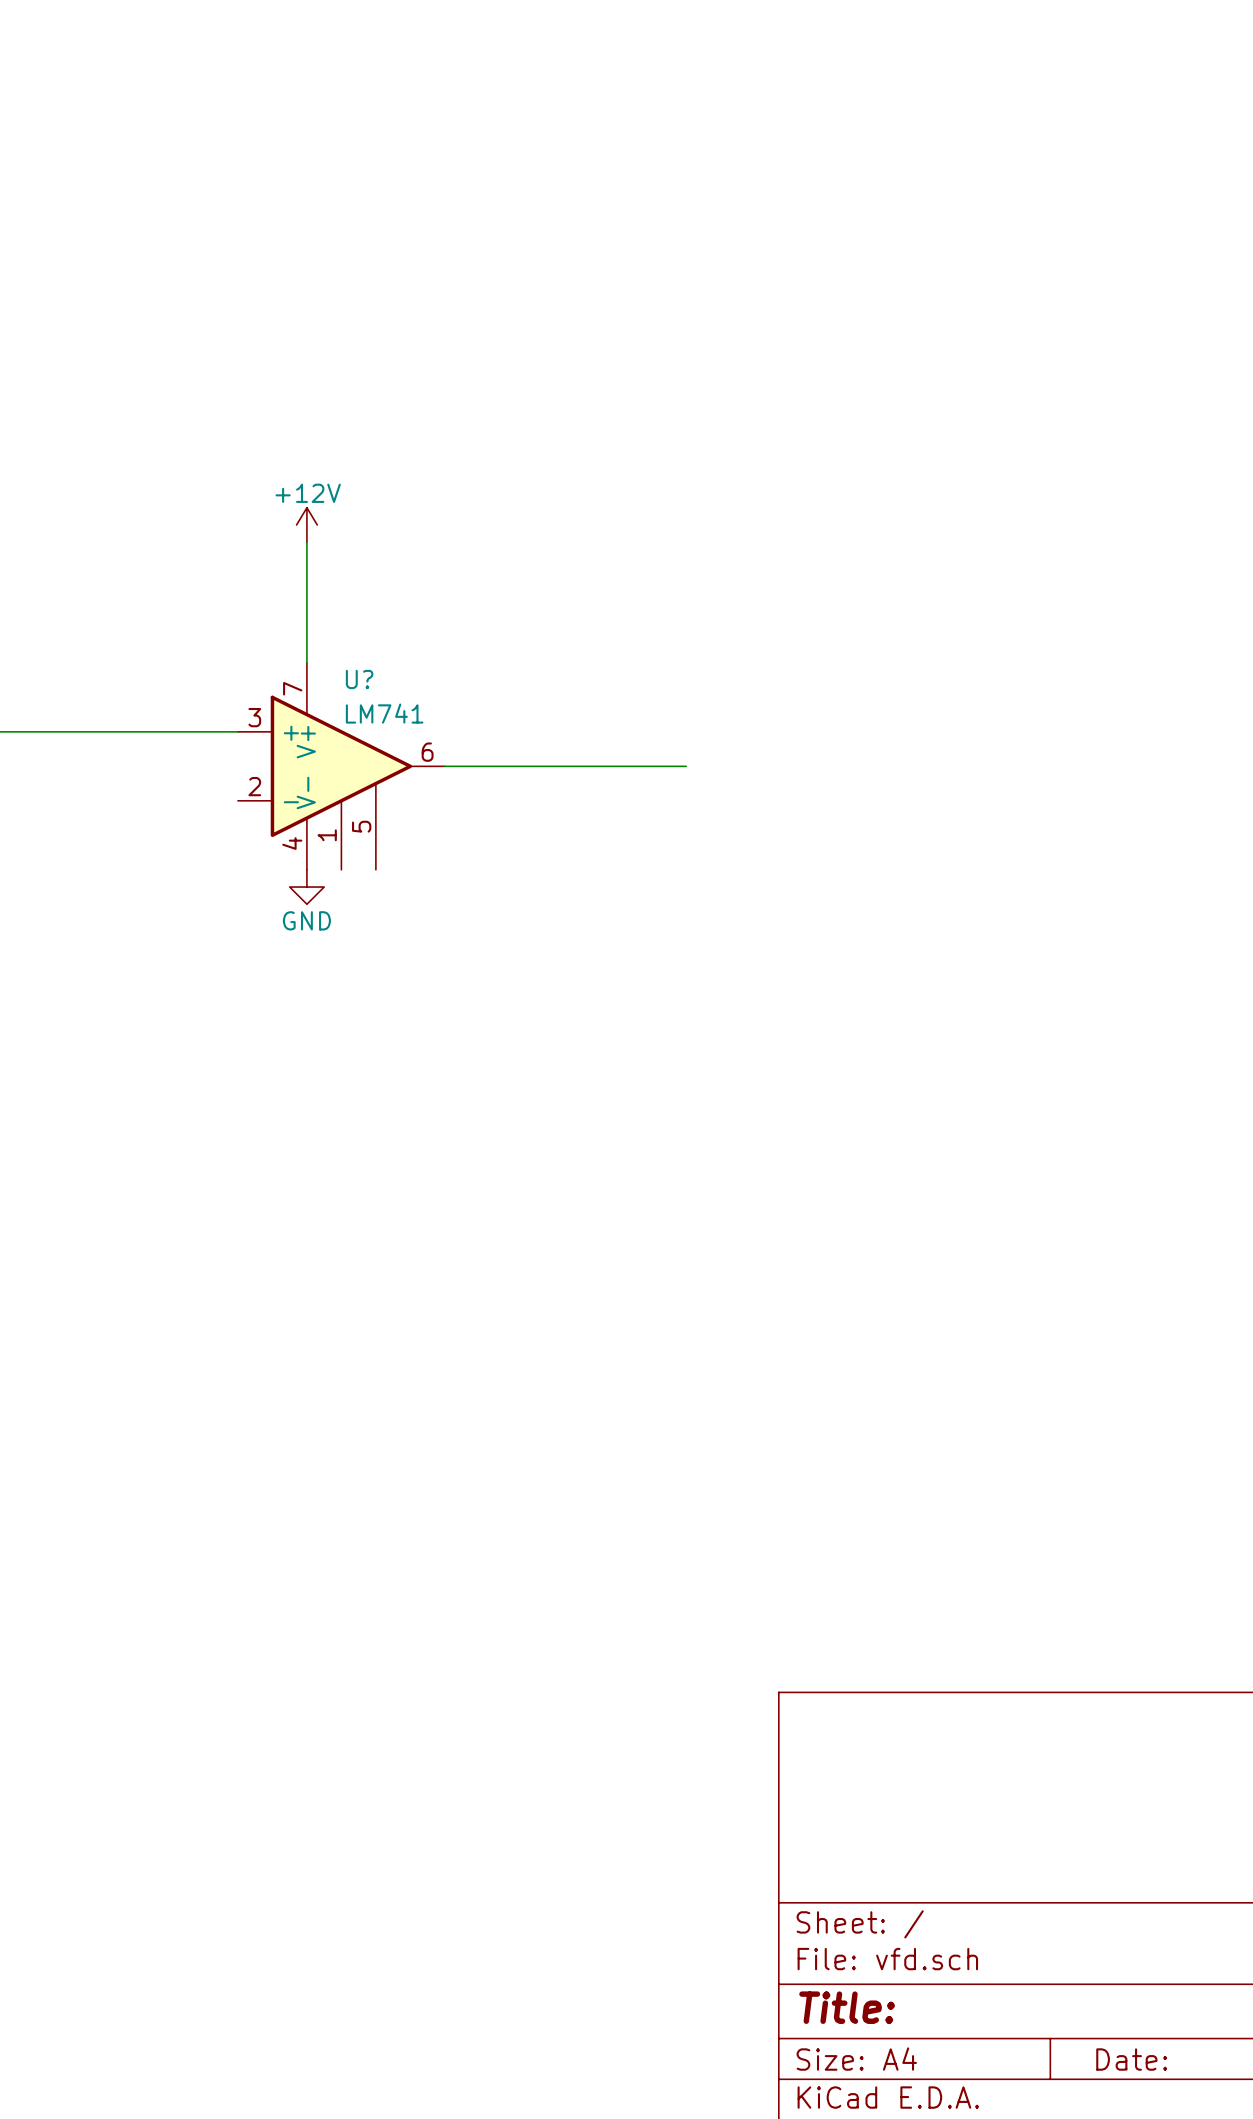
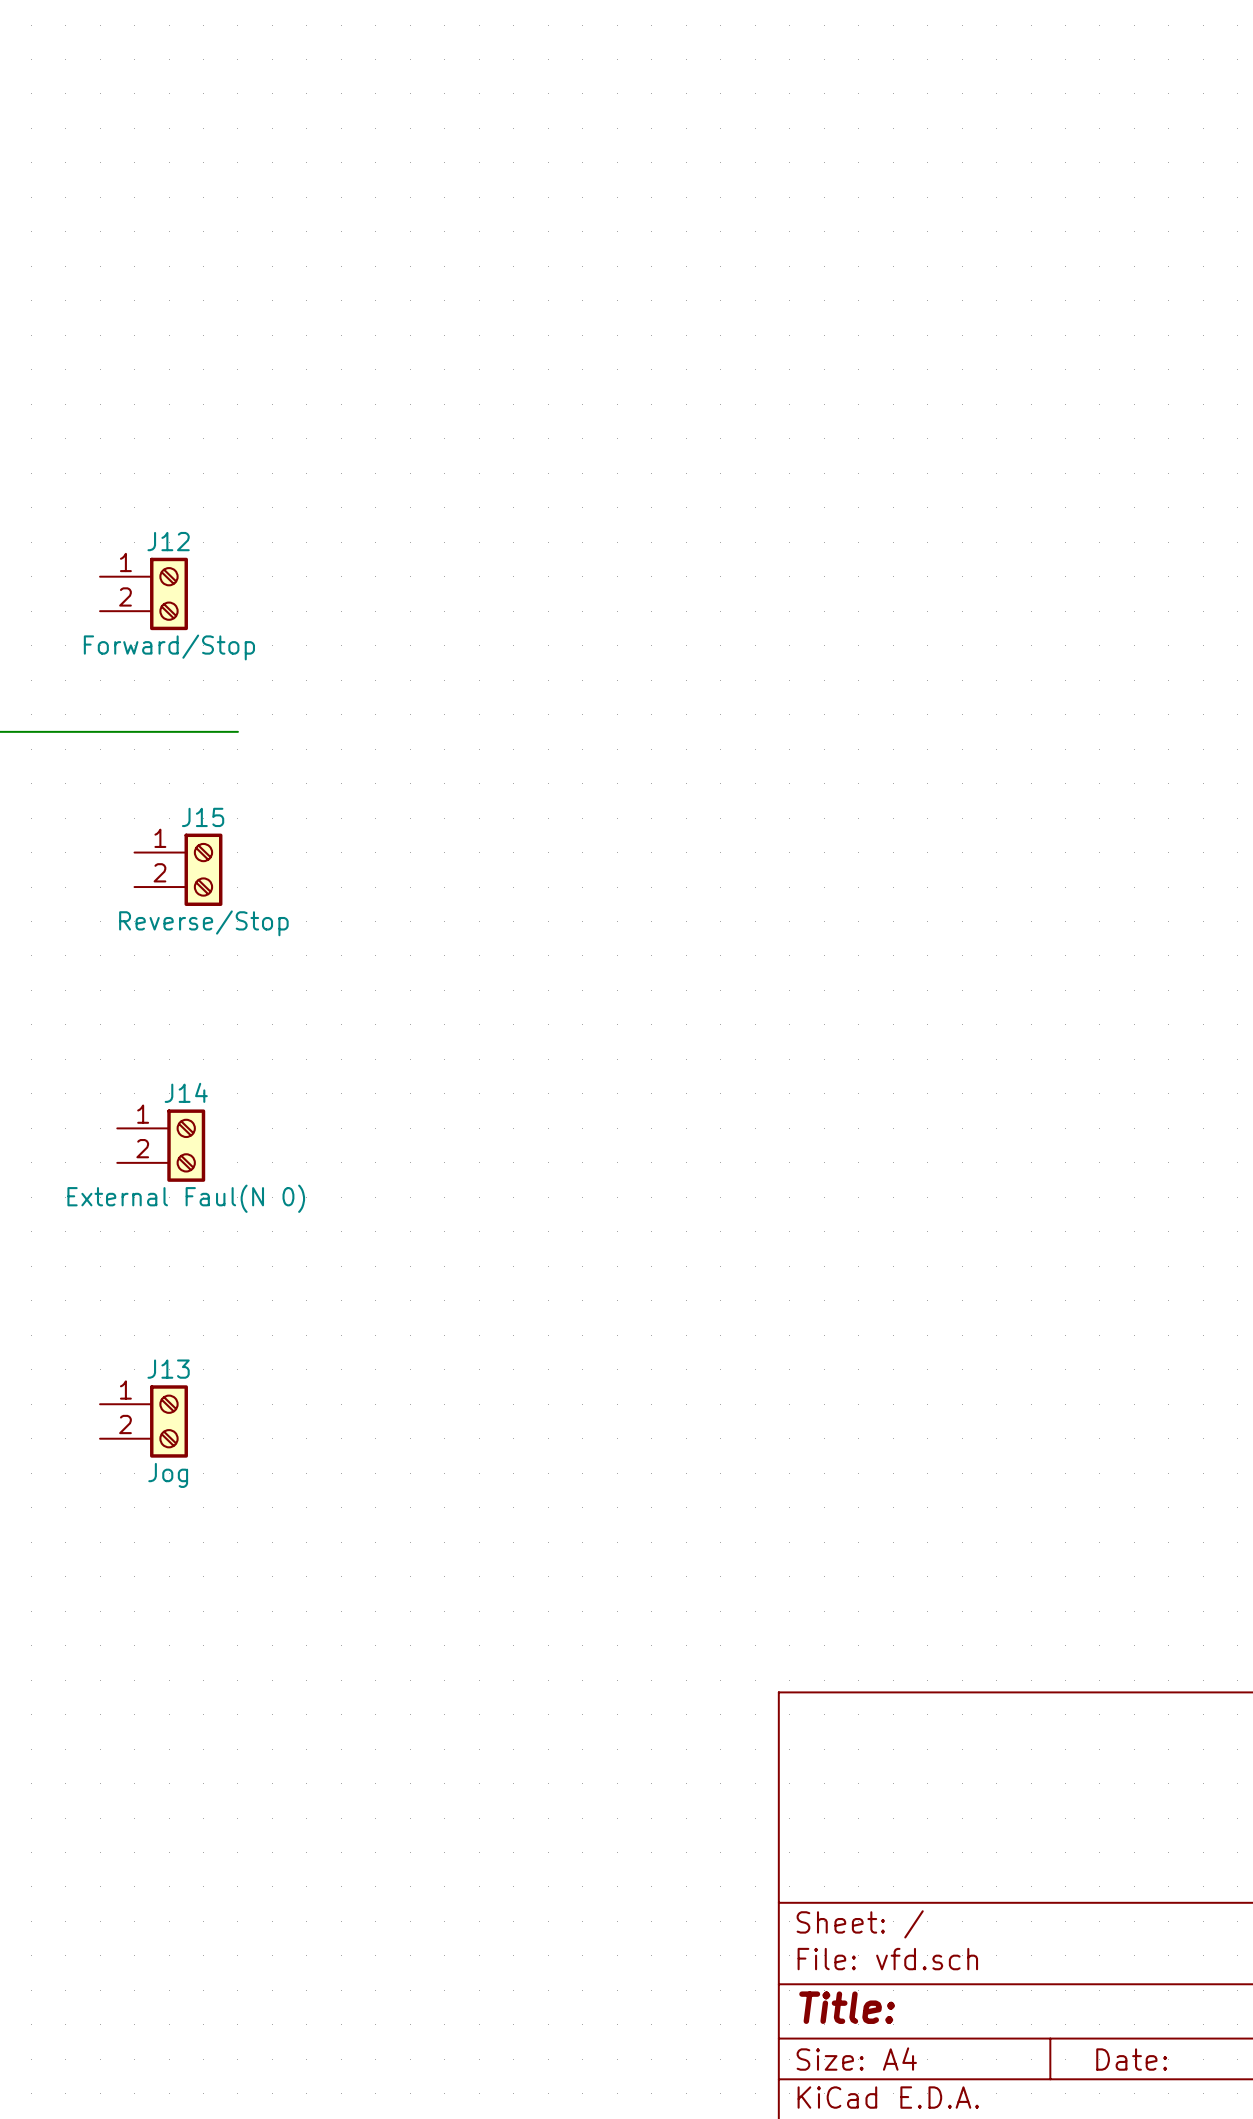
power symbol: +12V (306, 524) -> none
wire: (306, 542) (306, 662) -> none
J12: none -> Forward/Stop (144, 593)
U?: LM741 (341, 766) -> none
wire: (444, 766) (686, 766) -> none
J15: none -> Reverse/Stop (178, 869)
power symbol: GND (306, 887) -> none
J14: none -> External Faul(N 0) (161, 1145)
J13: none -> Jog (144, 1421)

